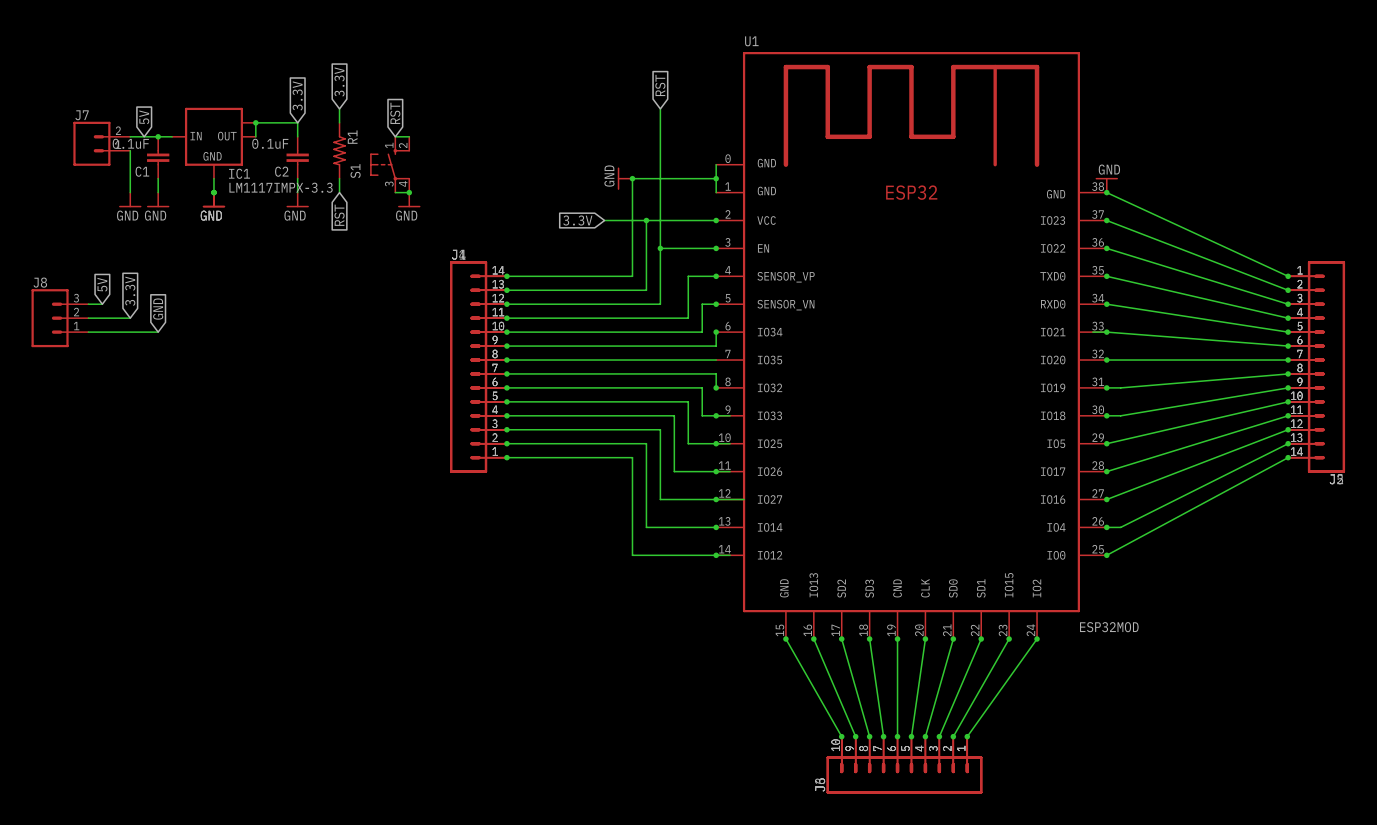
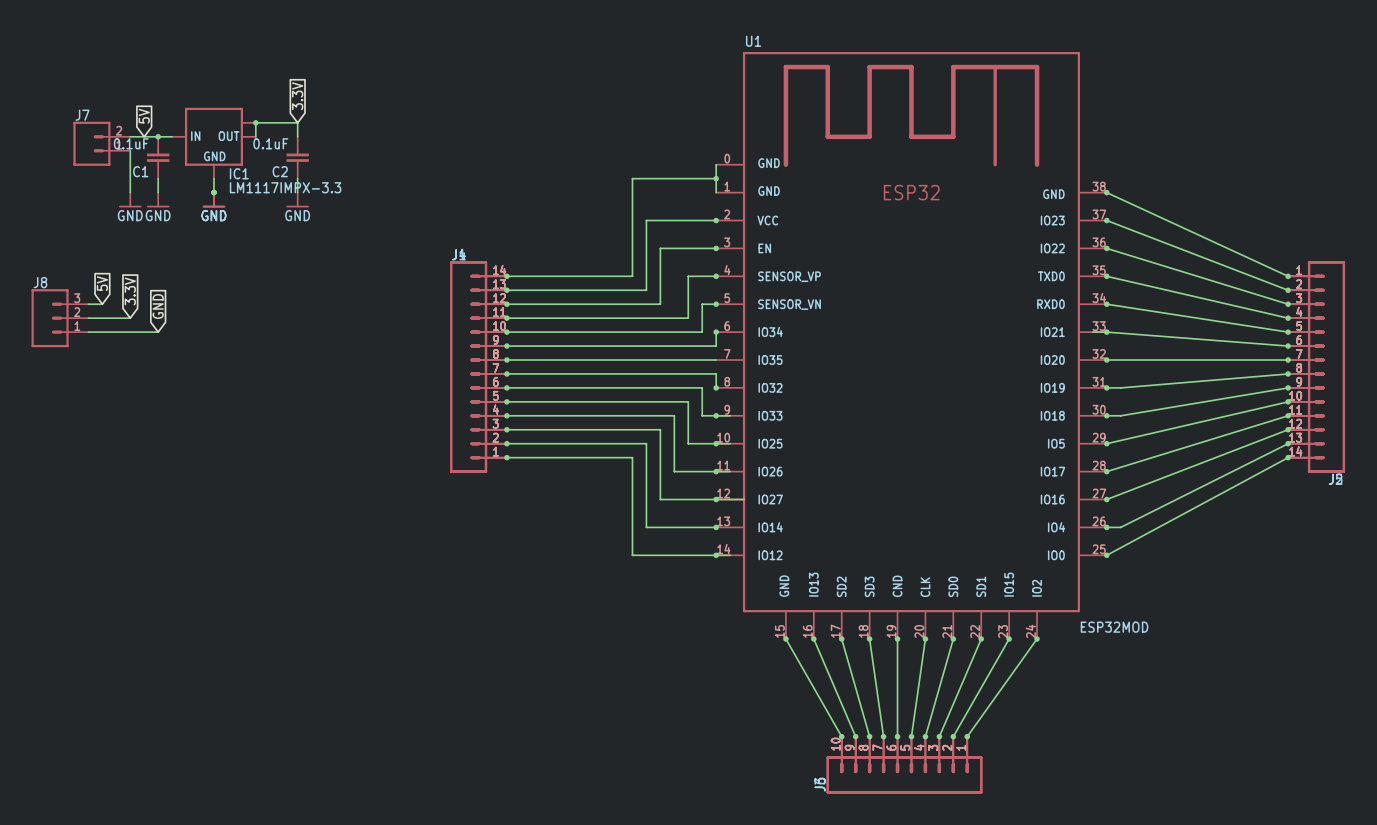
global label: 3.3V (339, 82) -> none
global label: RST (660, 85) -> none
wire: (339, 108) (339, 122) -> none
wire: (660, 108) (660, 248) -> none
global label: RST (395, 113) -> none
wire: (395, 136) (409, 136) -> none
R1: (339, 150) -> none
S1: (389, 164) -> none
wire: (339, 178) (339, 192) -> none
power symbol: GND (625, 178) -> none
junction: (632, 178) -> none
power symbol: GND (1106, 185) -> none
wire: (395, 192) (409, 192) -> none
junction: (409, 192) -> none
power symbol: GND (409, 199) -> none
global label: RST (339, 215) -> none
global label: 3.3V (577, 220) -> none
wire: (604, 220) (646, 220) -> none
junction: (646, 220) -> none
junction: (660, 248) -> none

